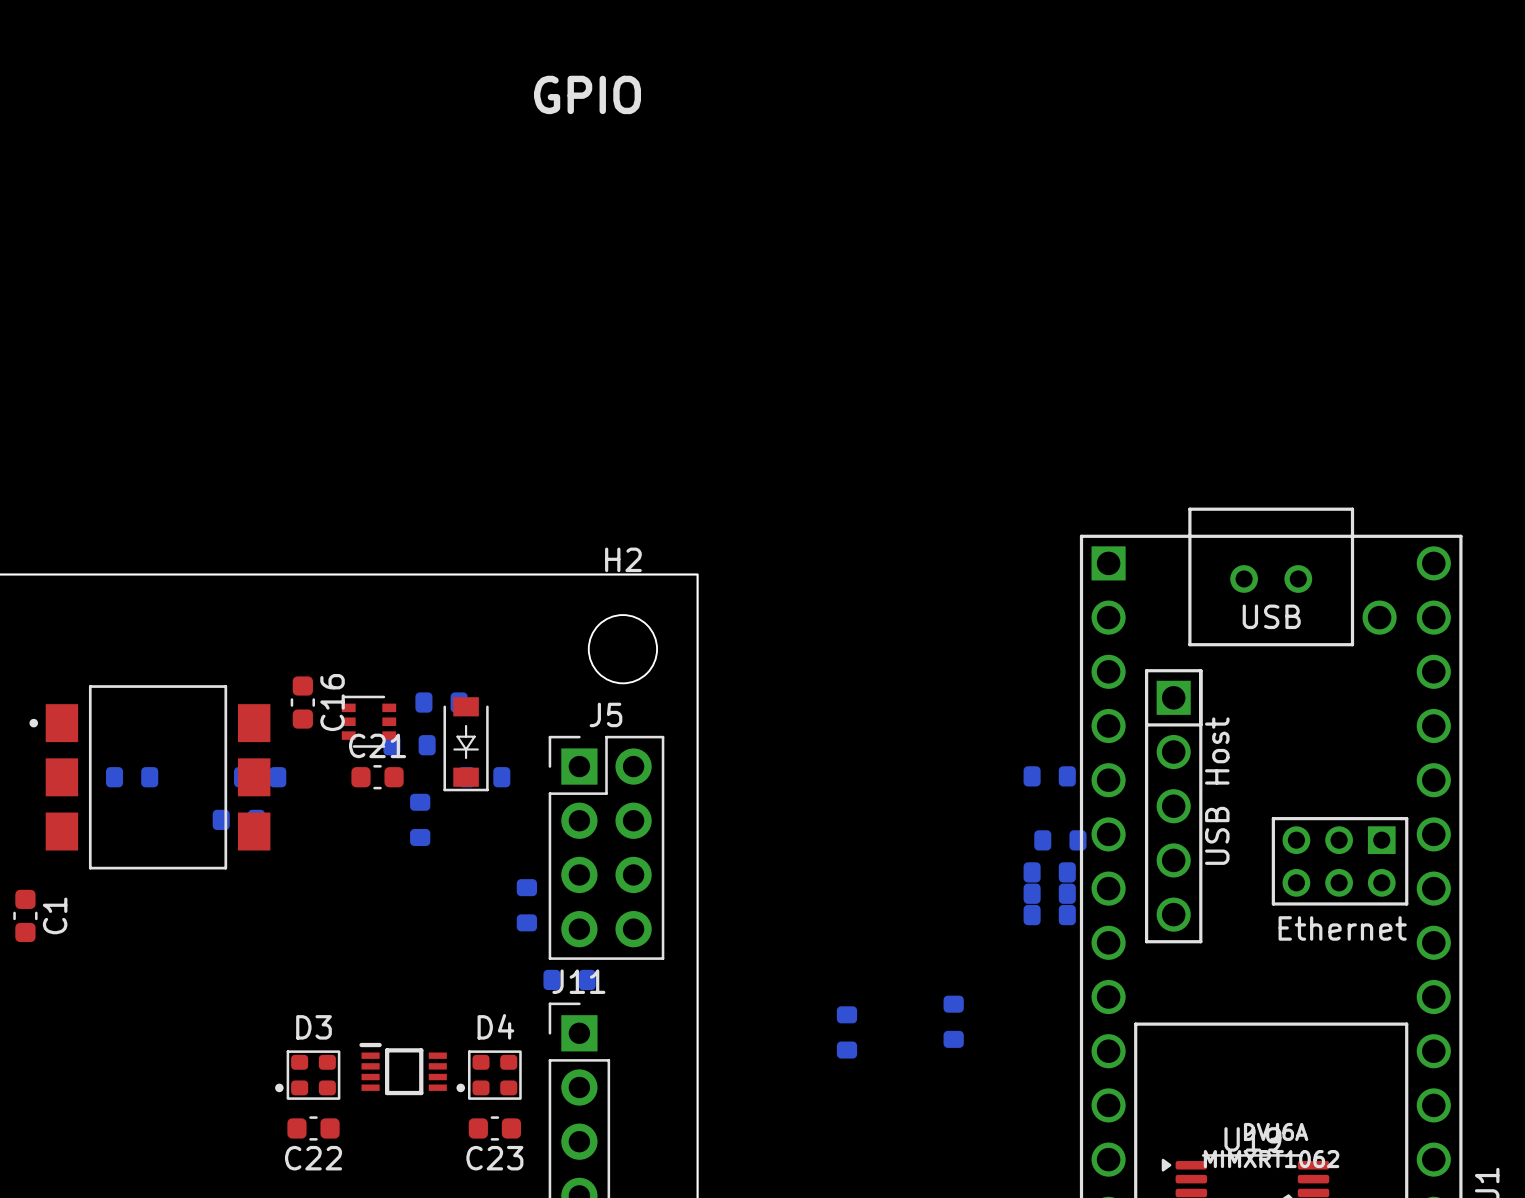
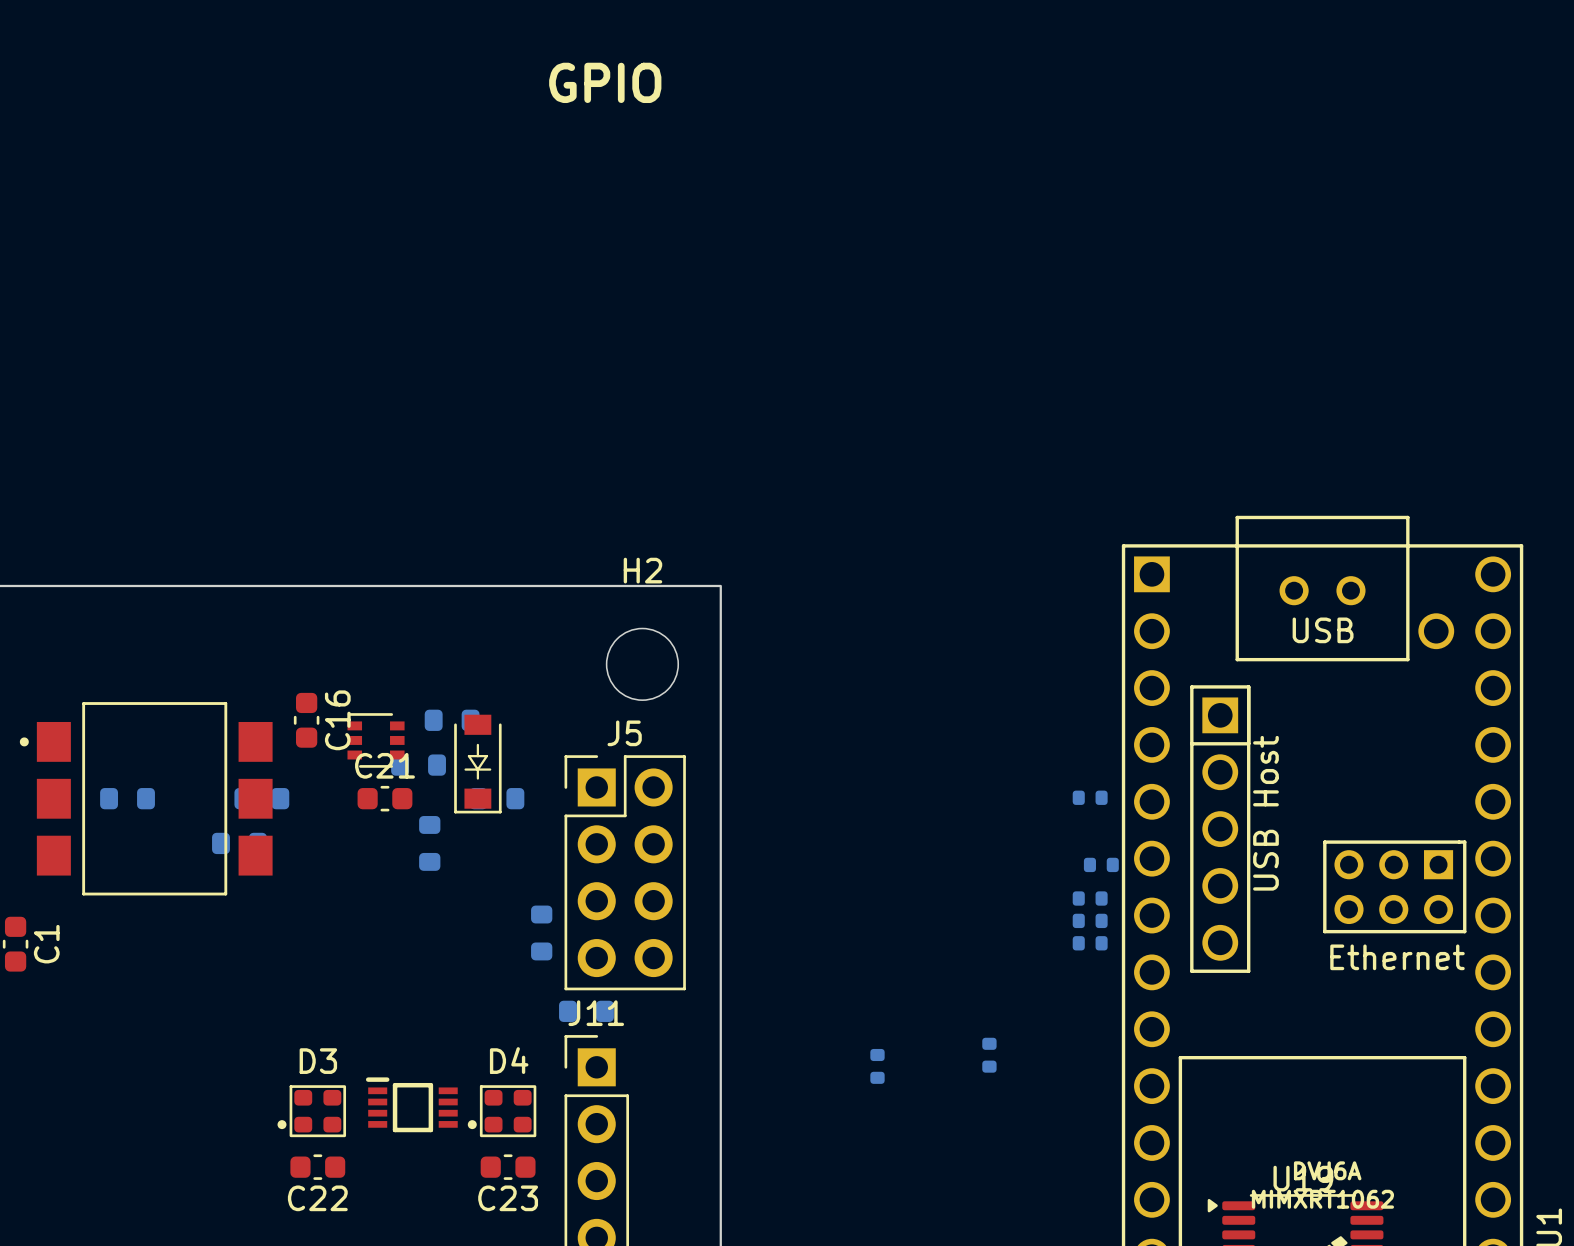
part footprint: [1023, 766, 1076, 787] -> [1072, 790, 1108, 805]
part footprint: [1034, 830, 1087, 851] -> [1083, 857, 1119, 873]
part footprint: [1023, 862, 1076, 883] -> [1072, 891, 1108, 906]
part footprint: [1023, 883, 1076, 904] -> [1072, 913, 1108, 929]
part footprint: [1023, 904, 1076, 926] -> [1072, 936, 1108, 951]
part footprint: [943, 995, 964, 1048] -> [982, 1037, 997, 1073]
part footprint: [836, 1006, 858, 1059] -> [870, 1048, 885, 1084]

